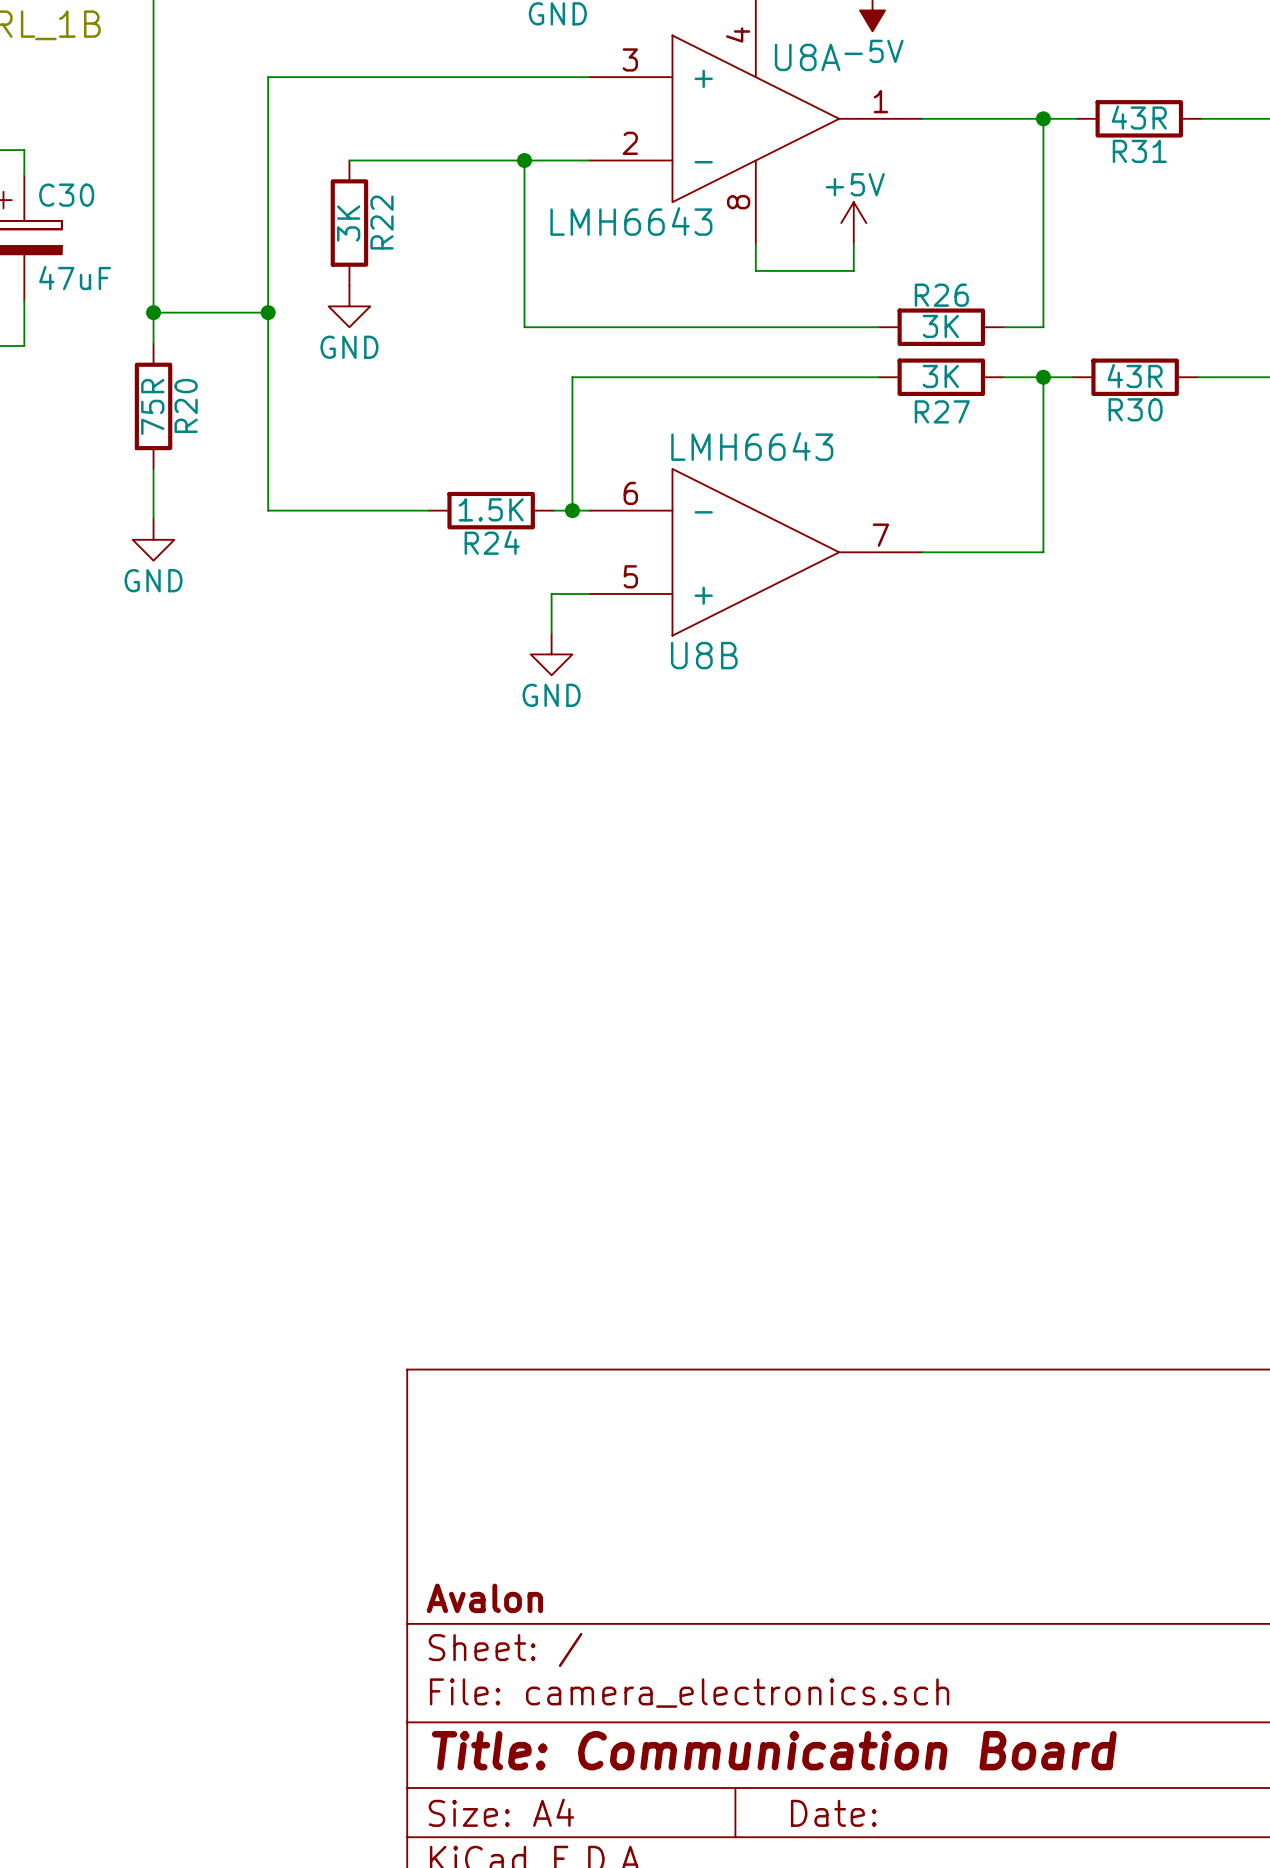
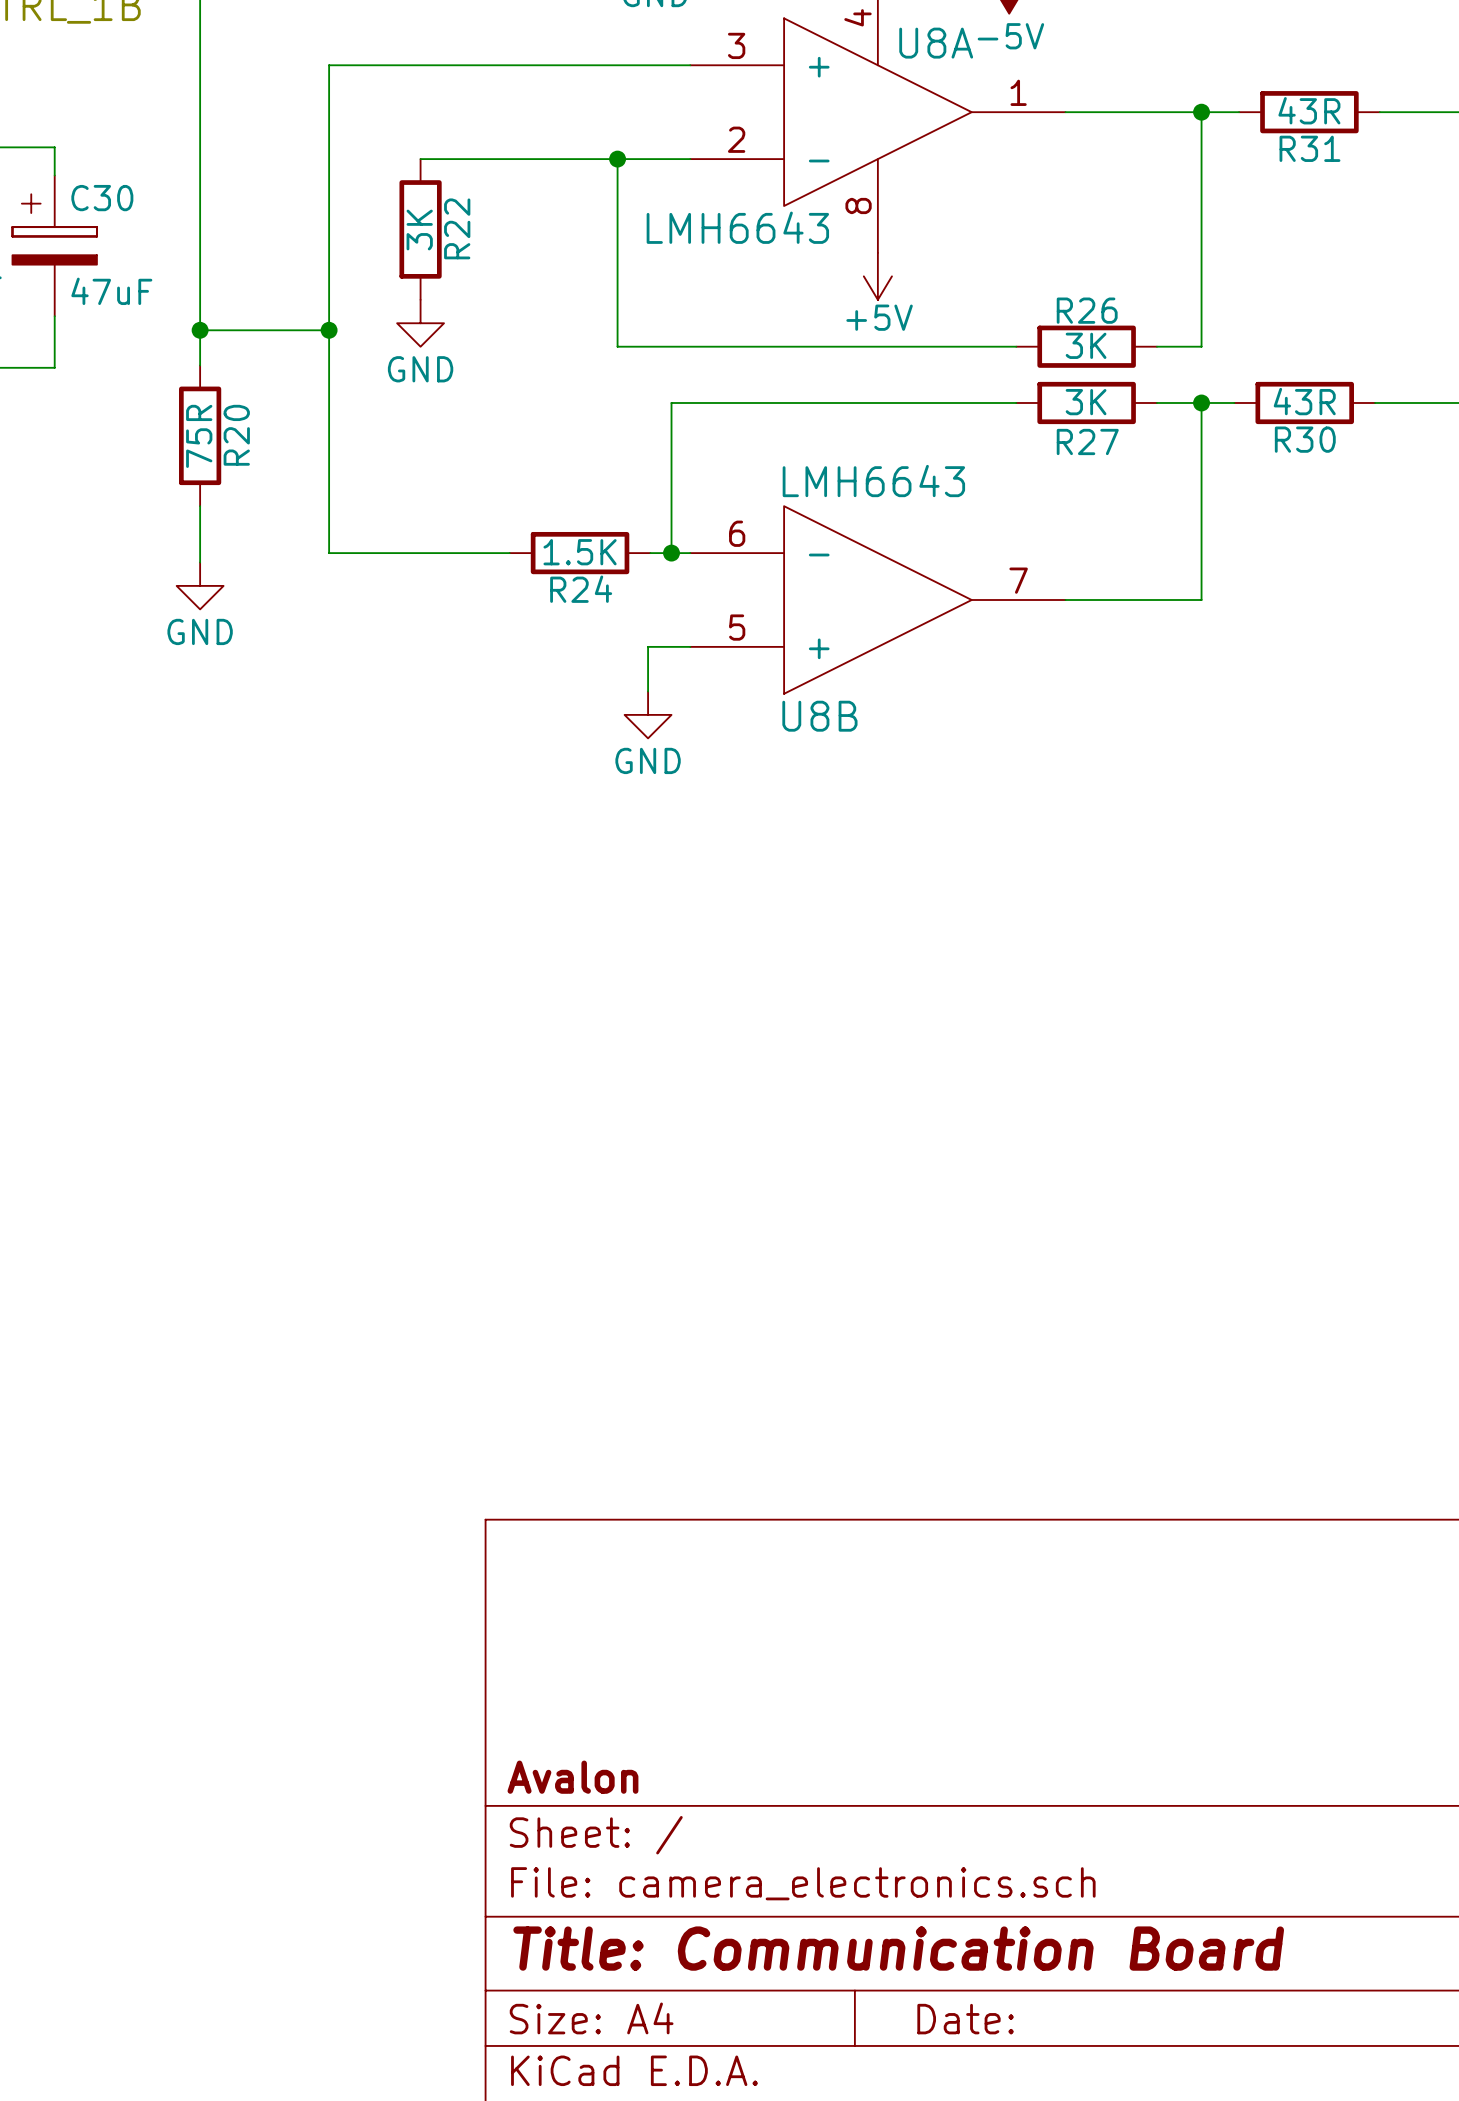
power symbol rotation: 0° (853, 223) -> 180° (877, 276)
power symbol position: +5V (853, 223) -> +5V (877, 276)
wire: (755, 243) (755, 270) (853, 270) (853, 243) -> none

